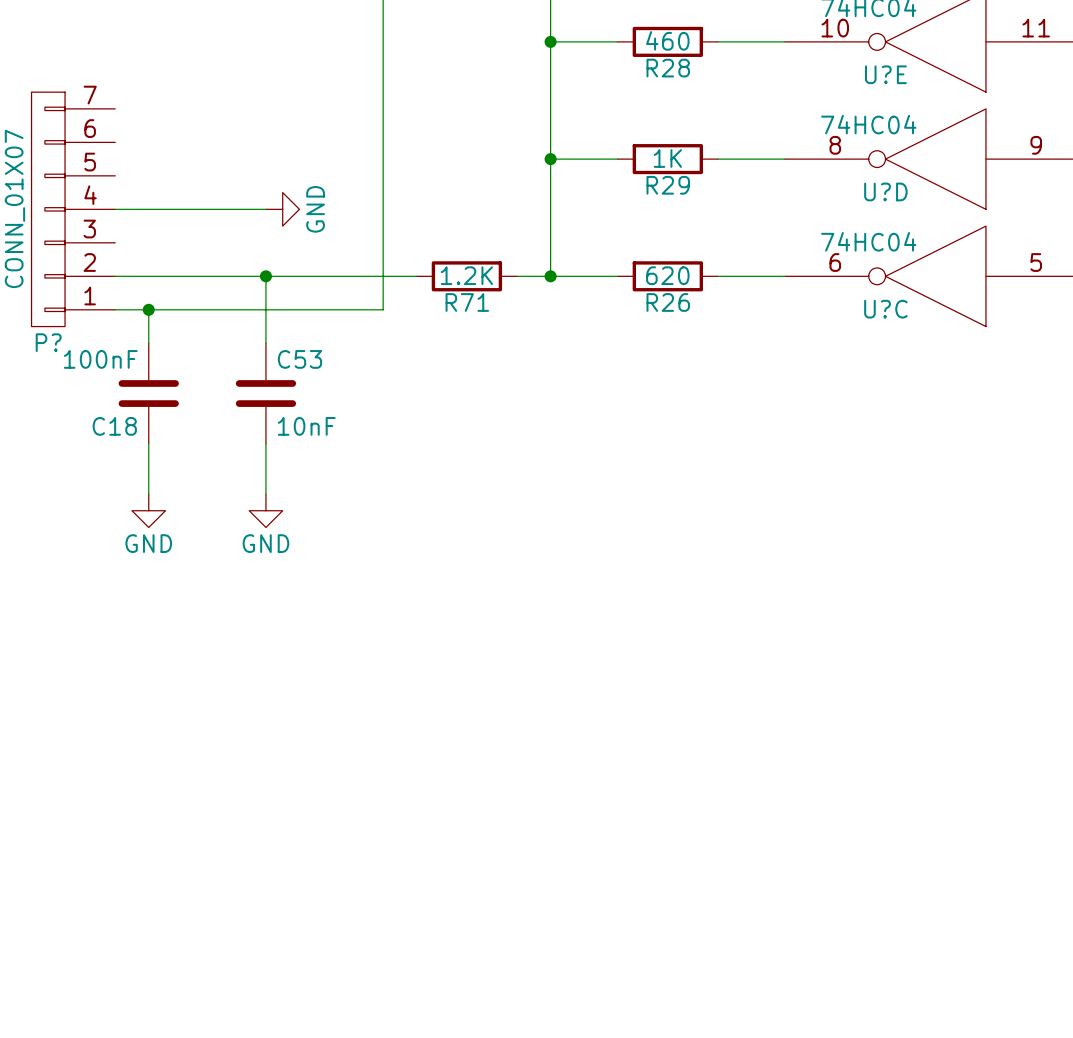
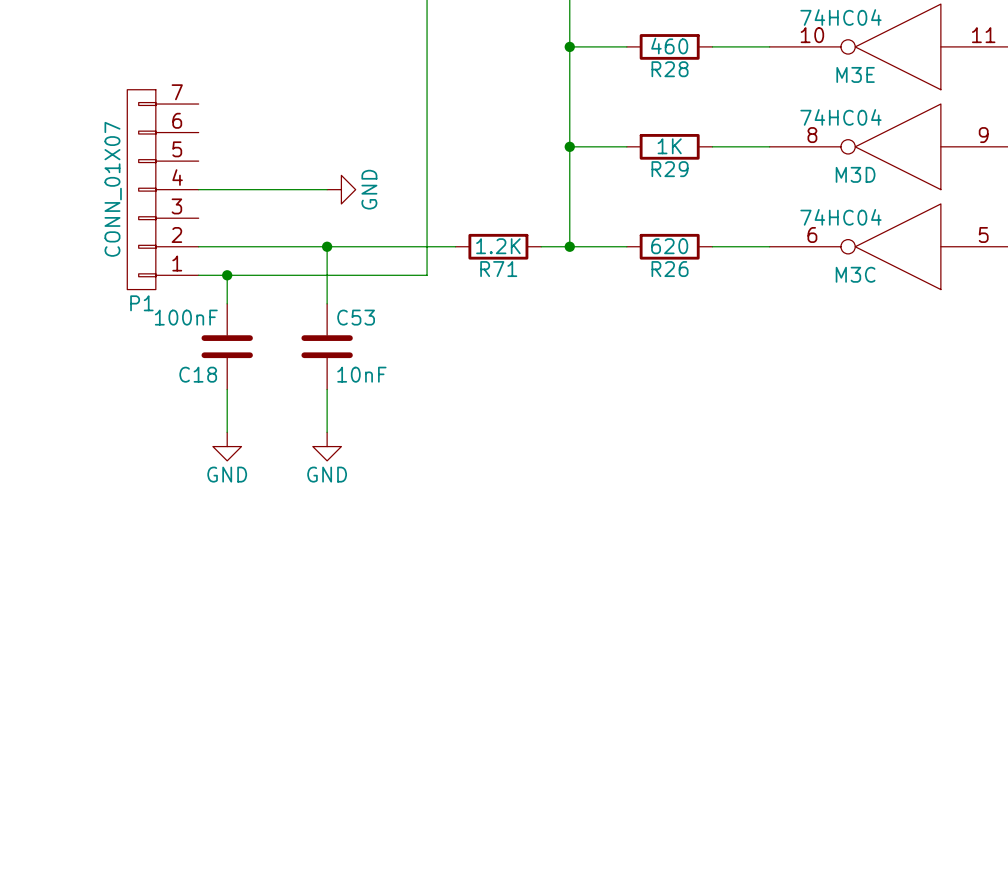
U?E name: U?E (885, 74) -> M3E (855, 74)
U?D name: U?D (885, 191) -> M3D (855, 174)
U?C name: U?C (885, 309) -> M3C (855, 274)
P? name: P? (48, 342) -> P1 (141, 303)

